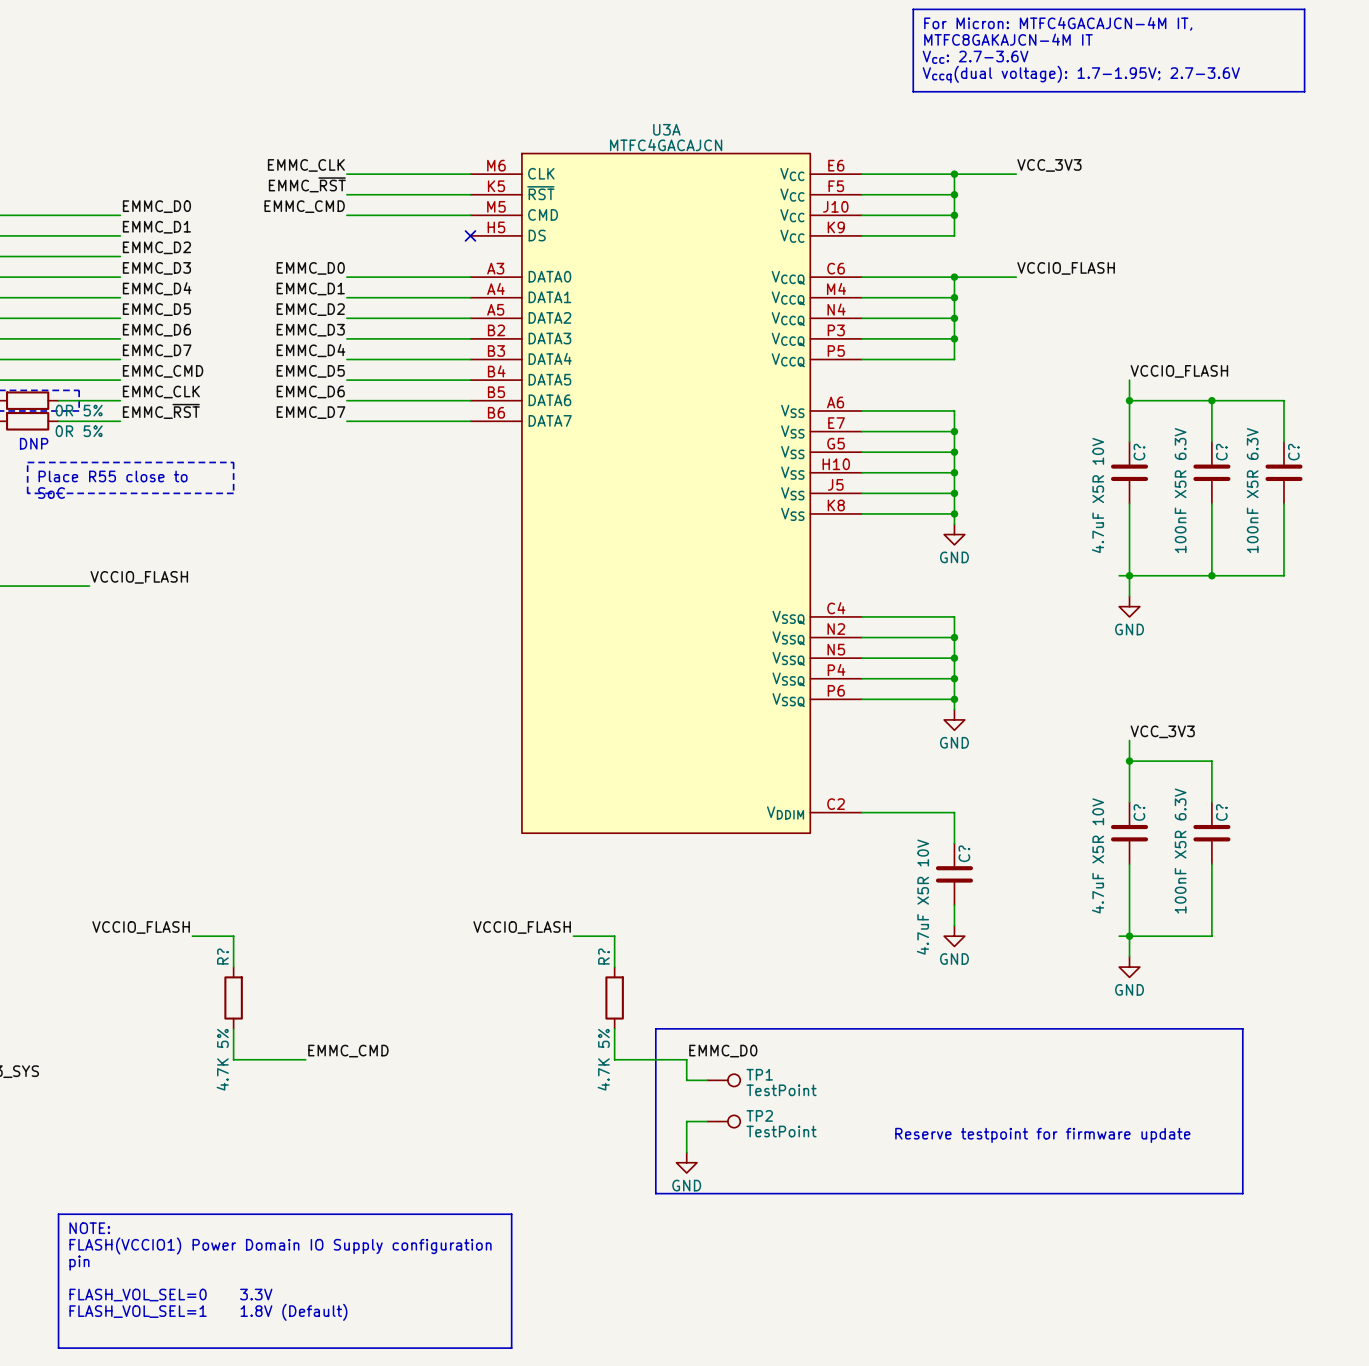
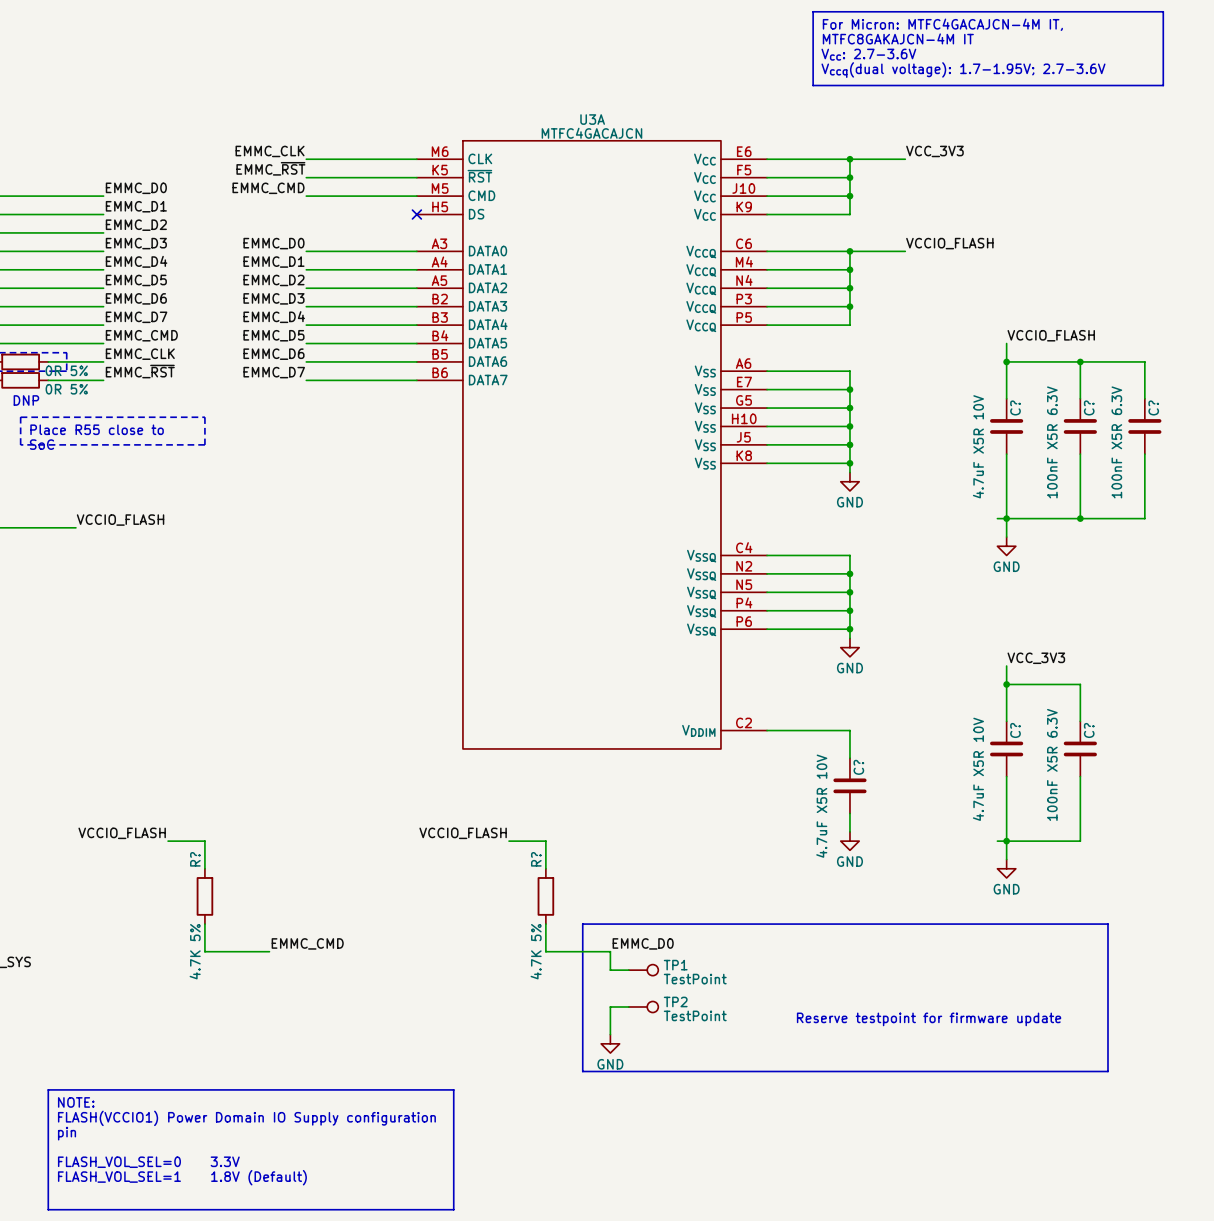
U3A symbol: [470, 153, 862, 834] -> [416, 140, 768, 749]

